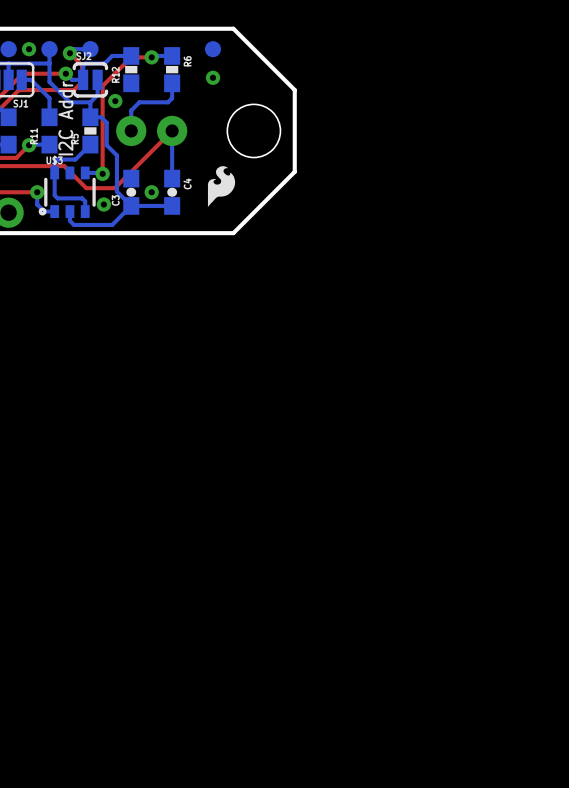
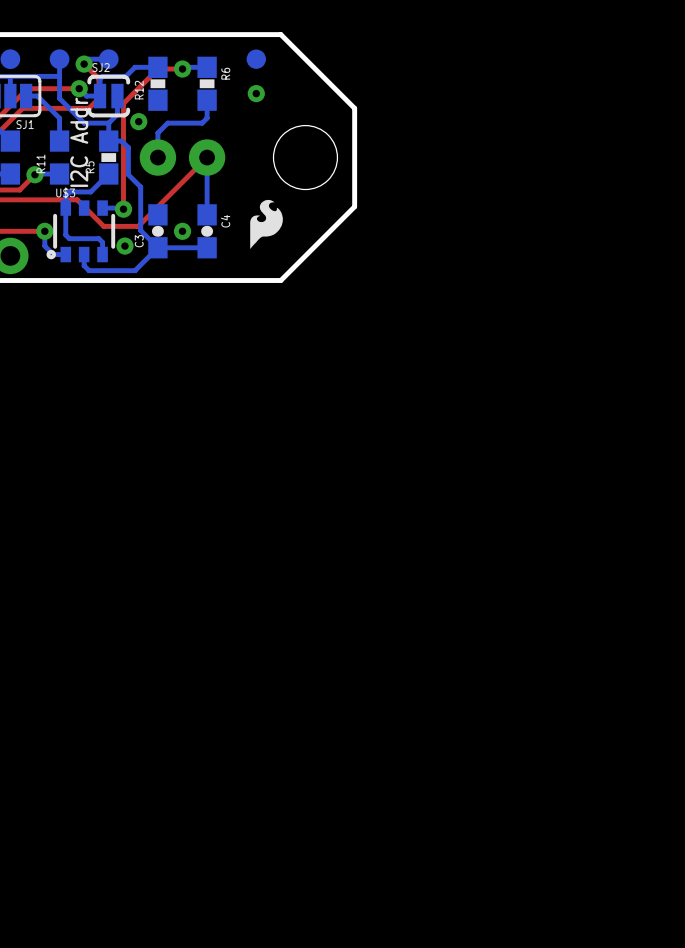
via: (29, 49) -> none

